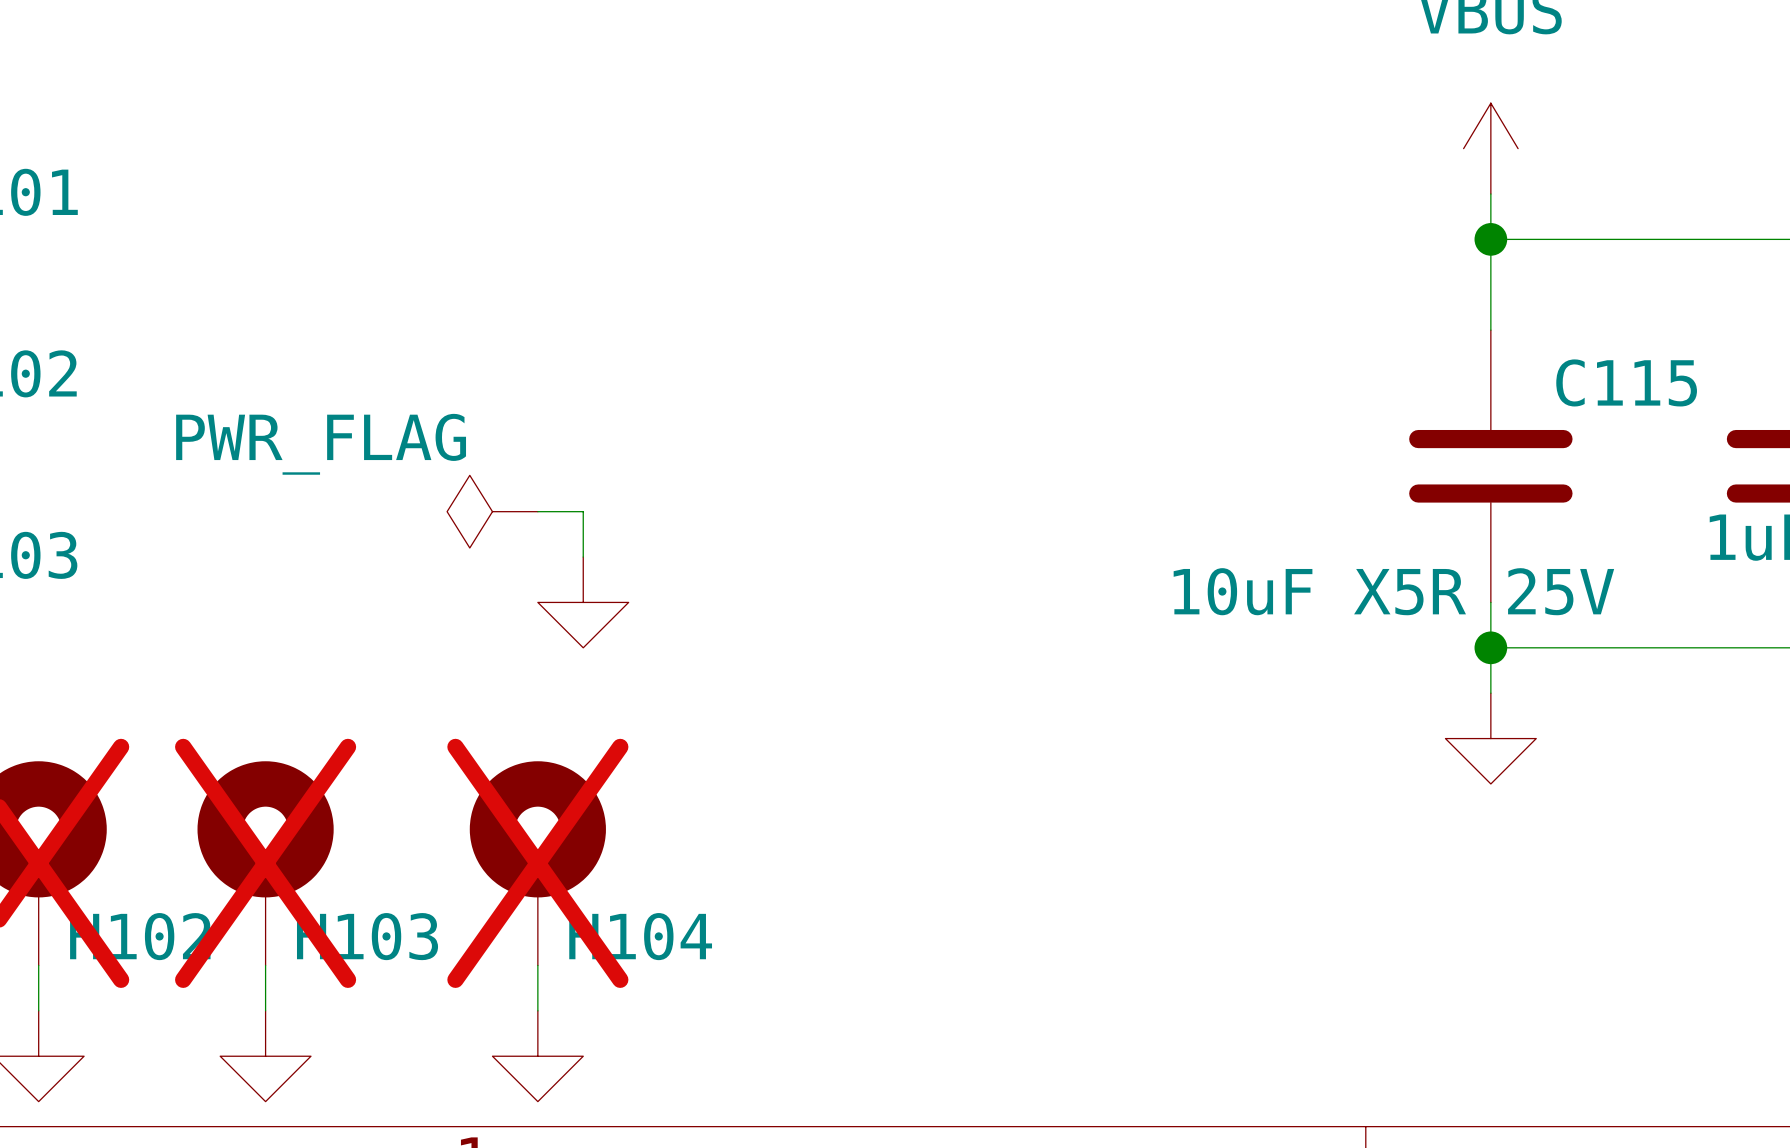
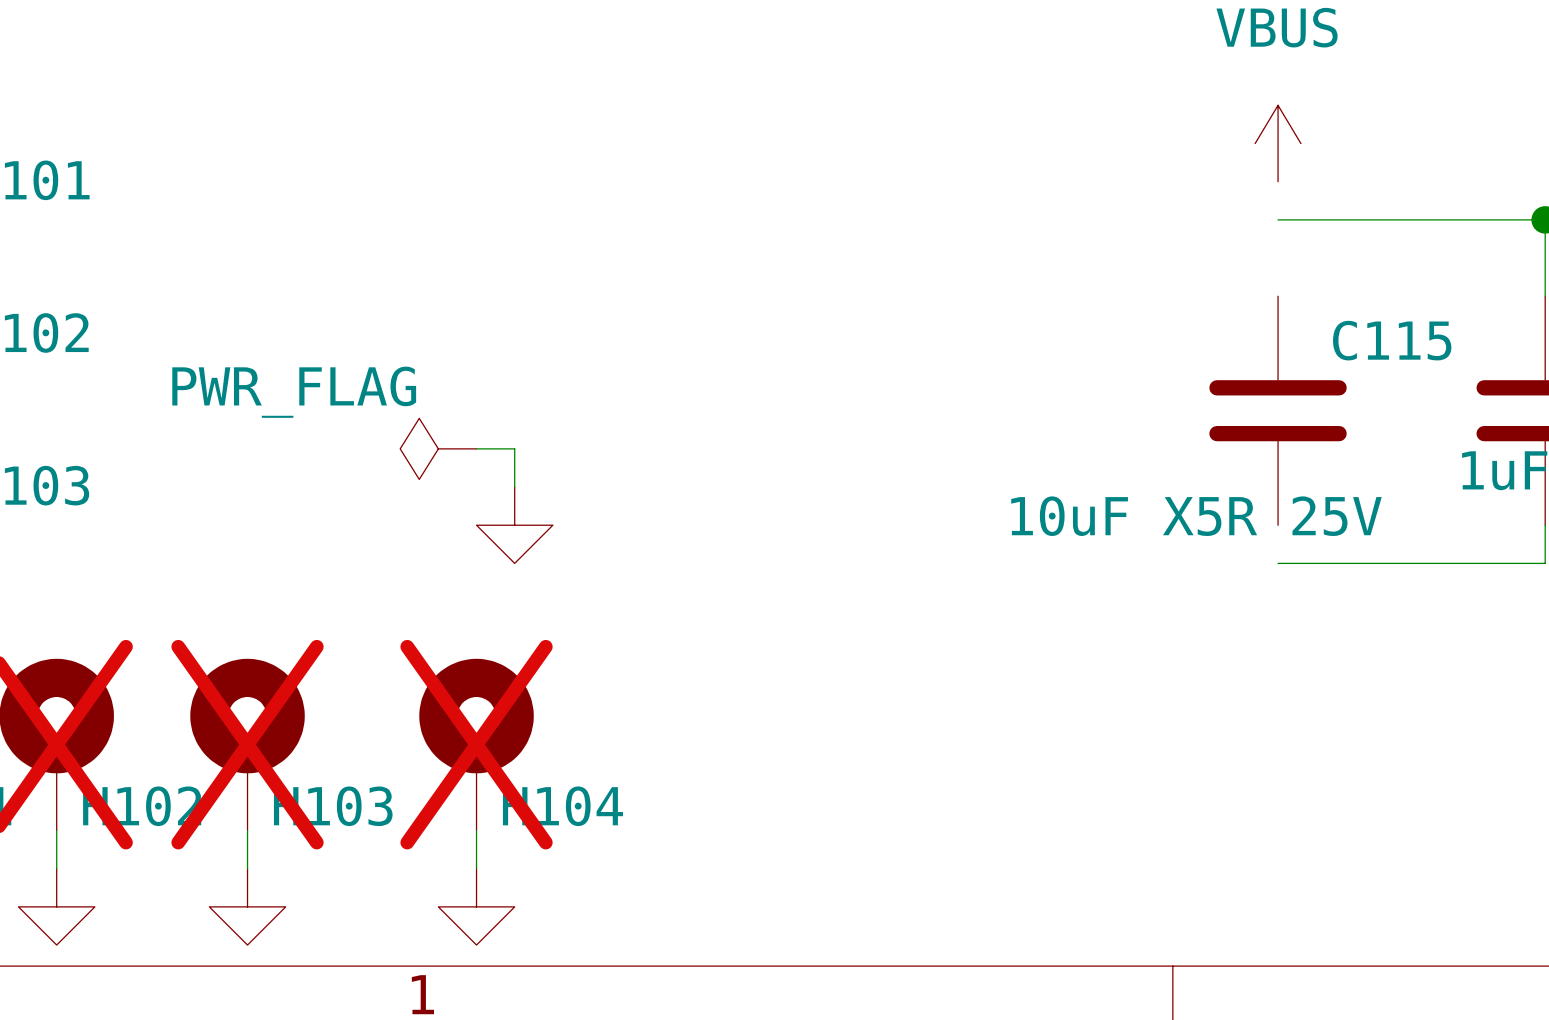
wire: (1490, 194) (1490, 330) -> none
junction: (1490, 239) -> none
wire: (1490, 602) (1490, 693) -> none
junction: (1490, 647) -> none
power symbol: (1490, 738) -> none

